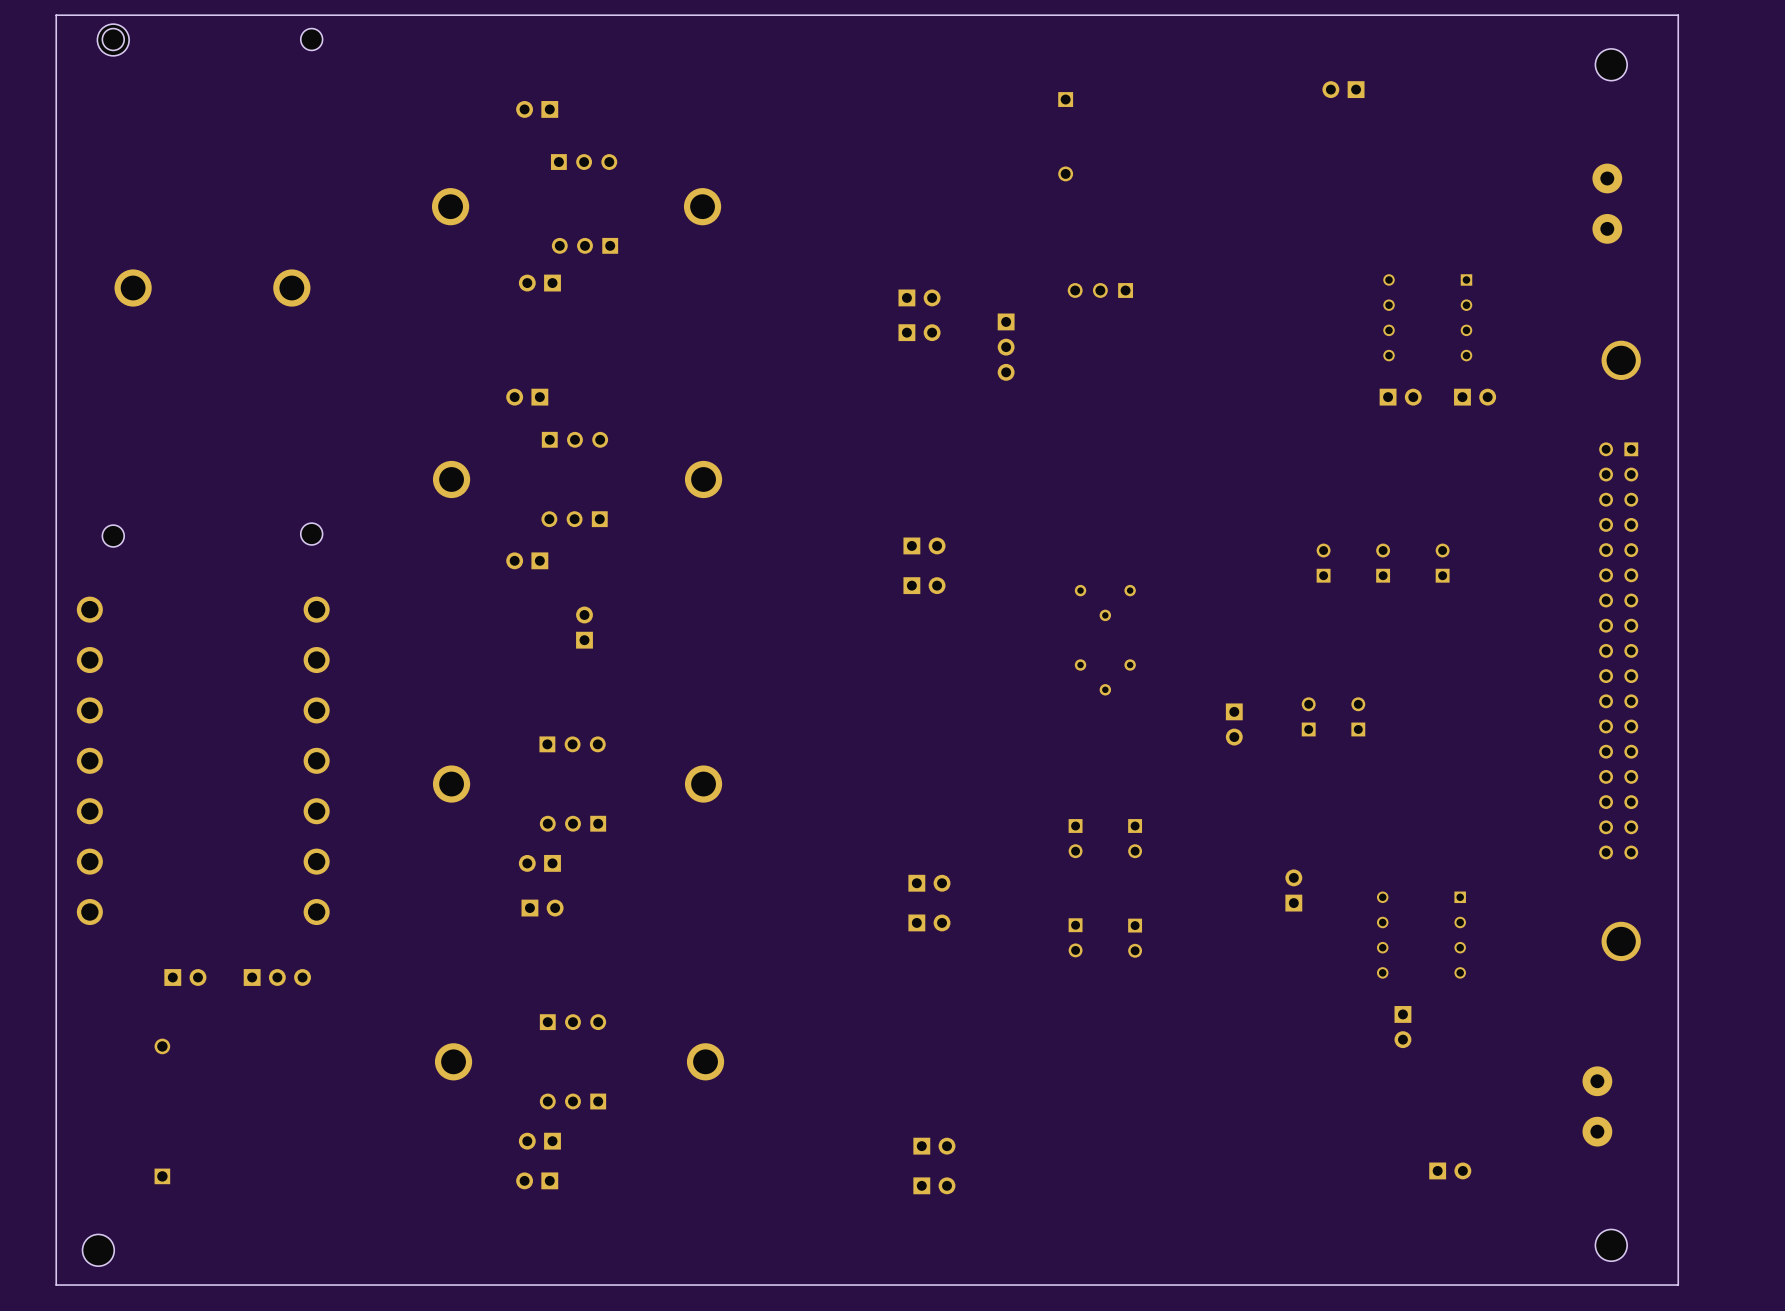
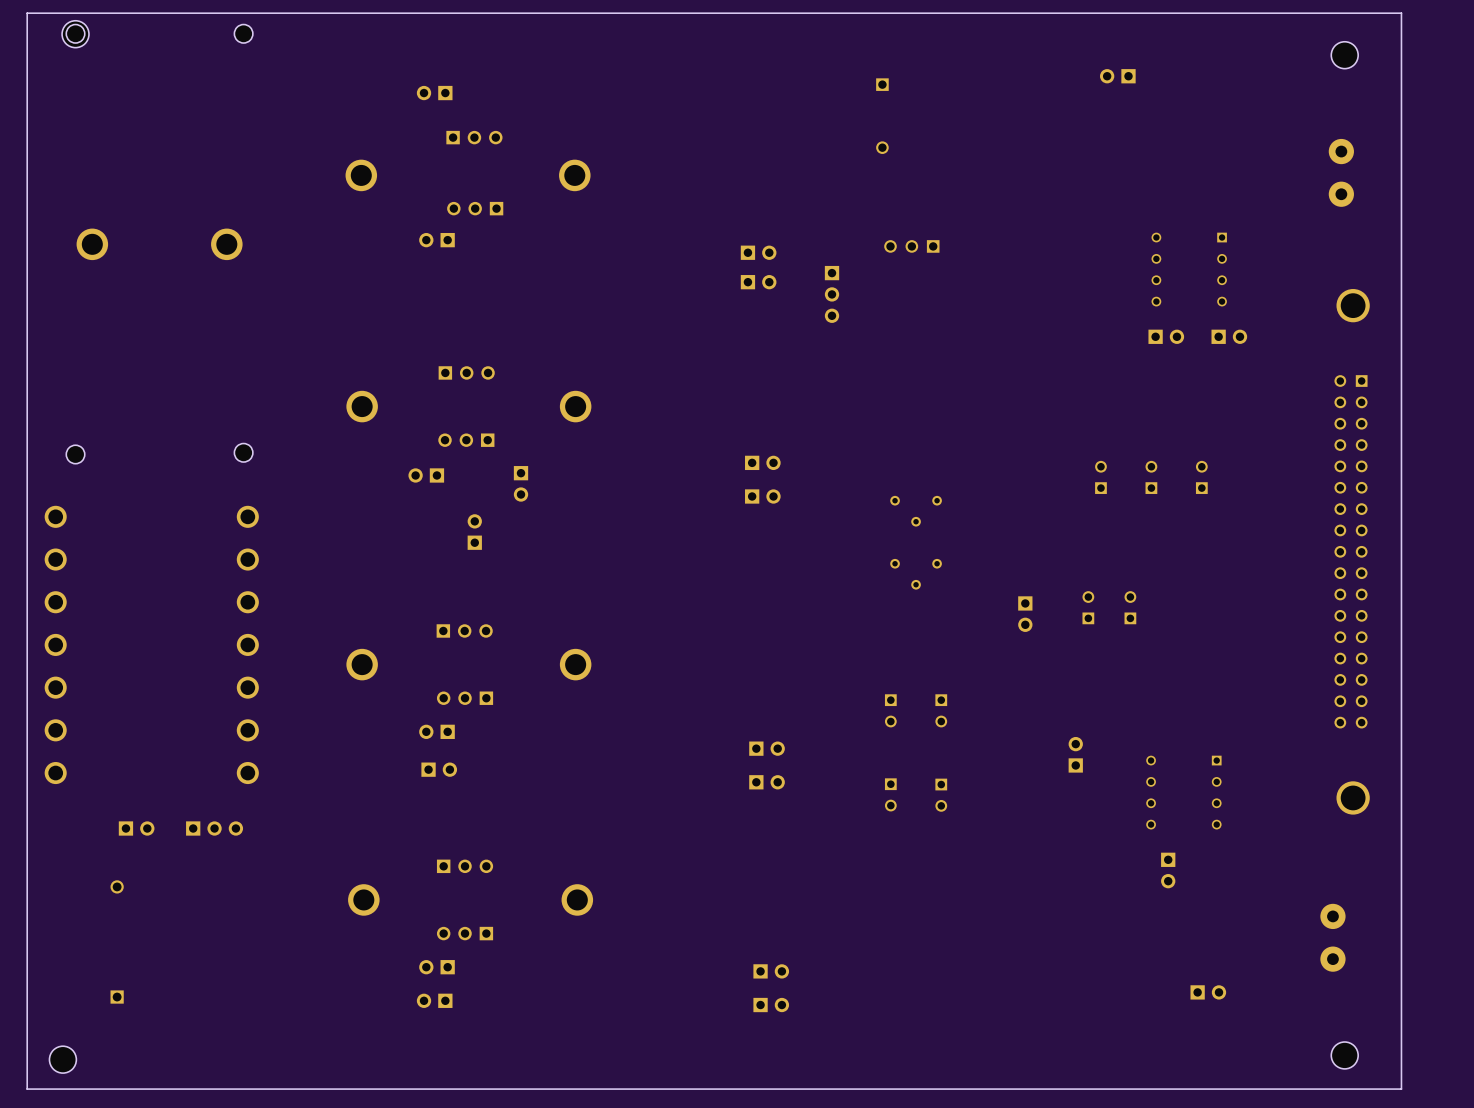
part rotation: 0° (527, 397) -> 90° counterclockwise (521, 483)
part position: (527, 397) -> (521, 483)

